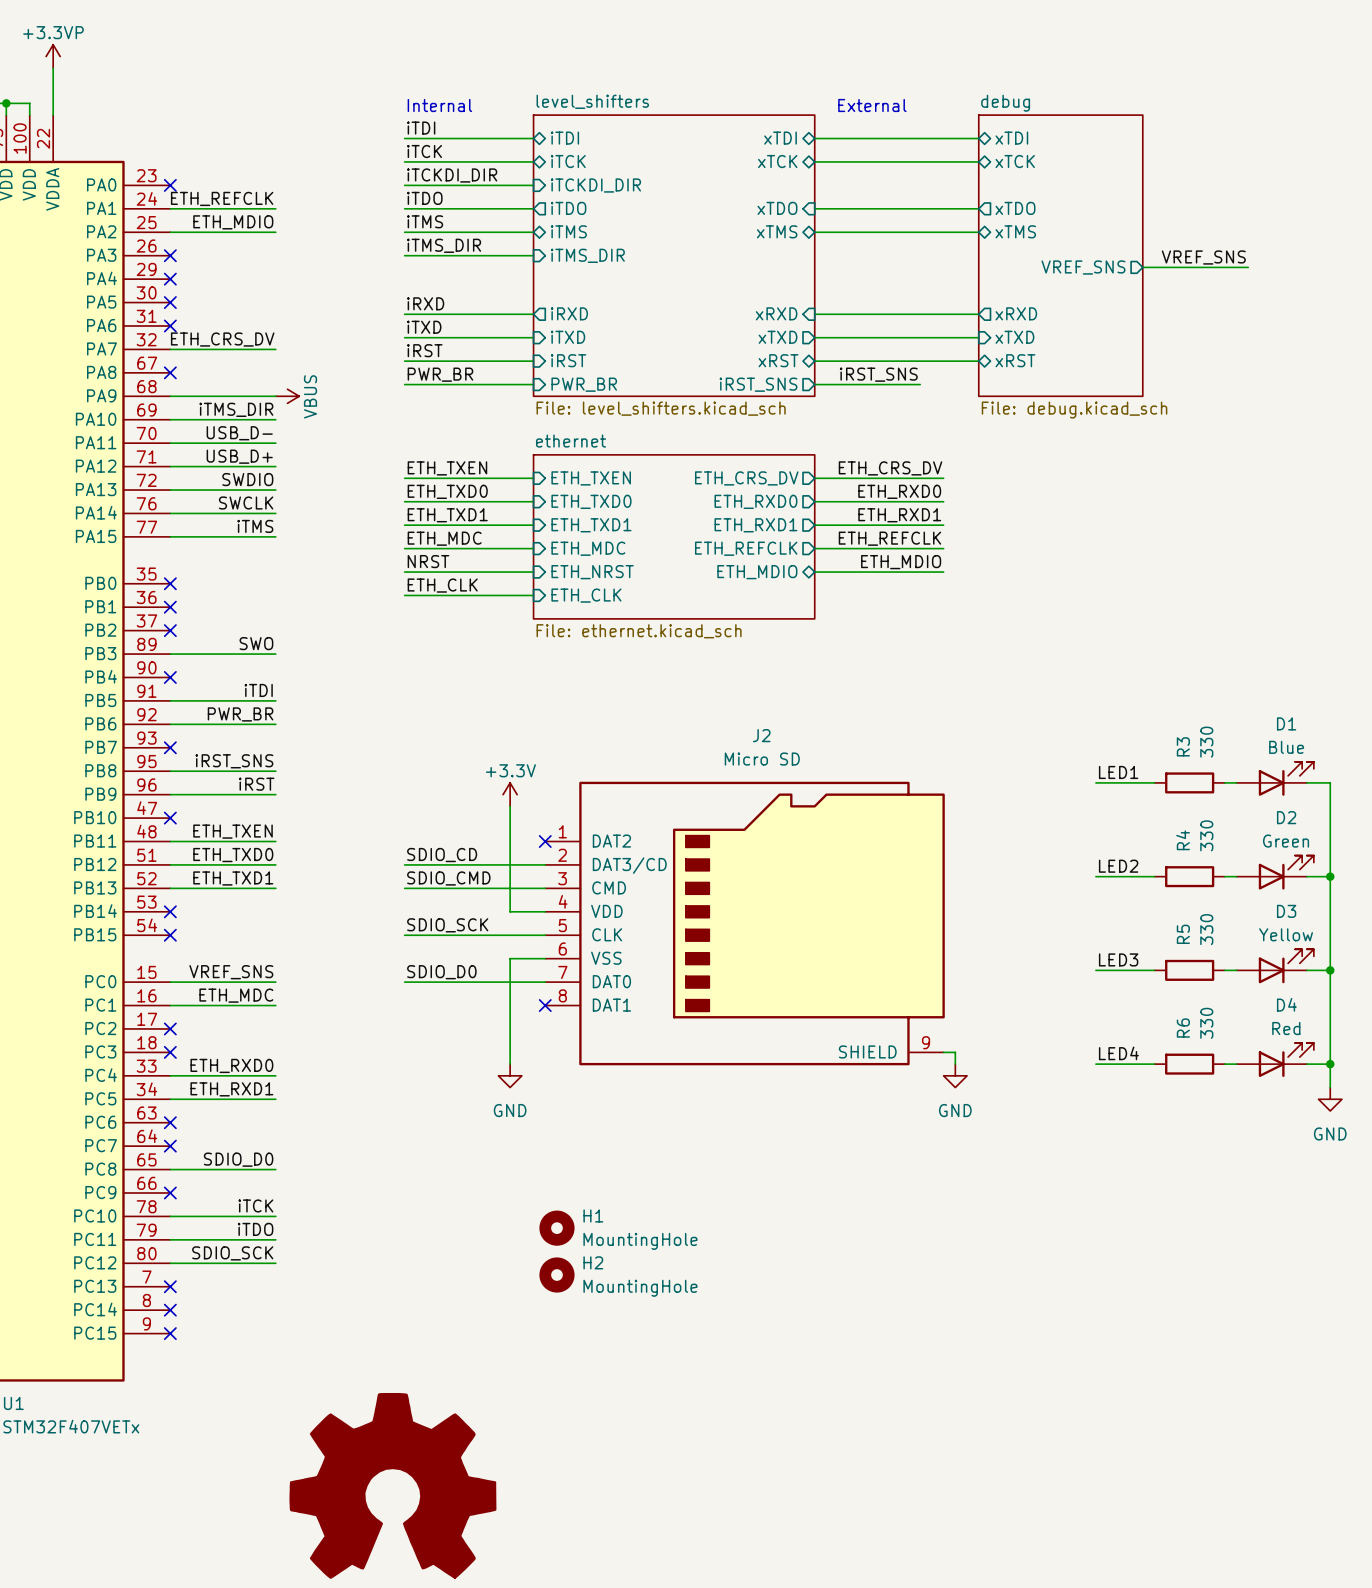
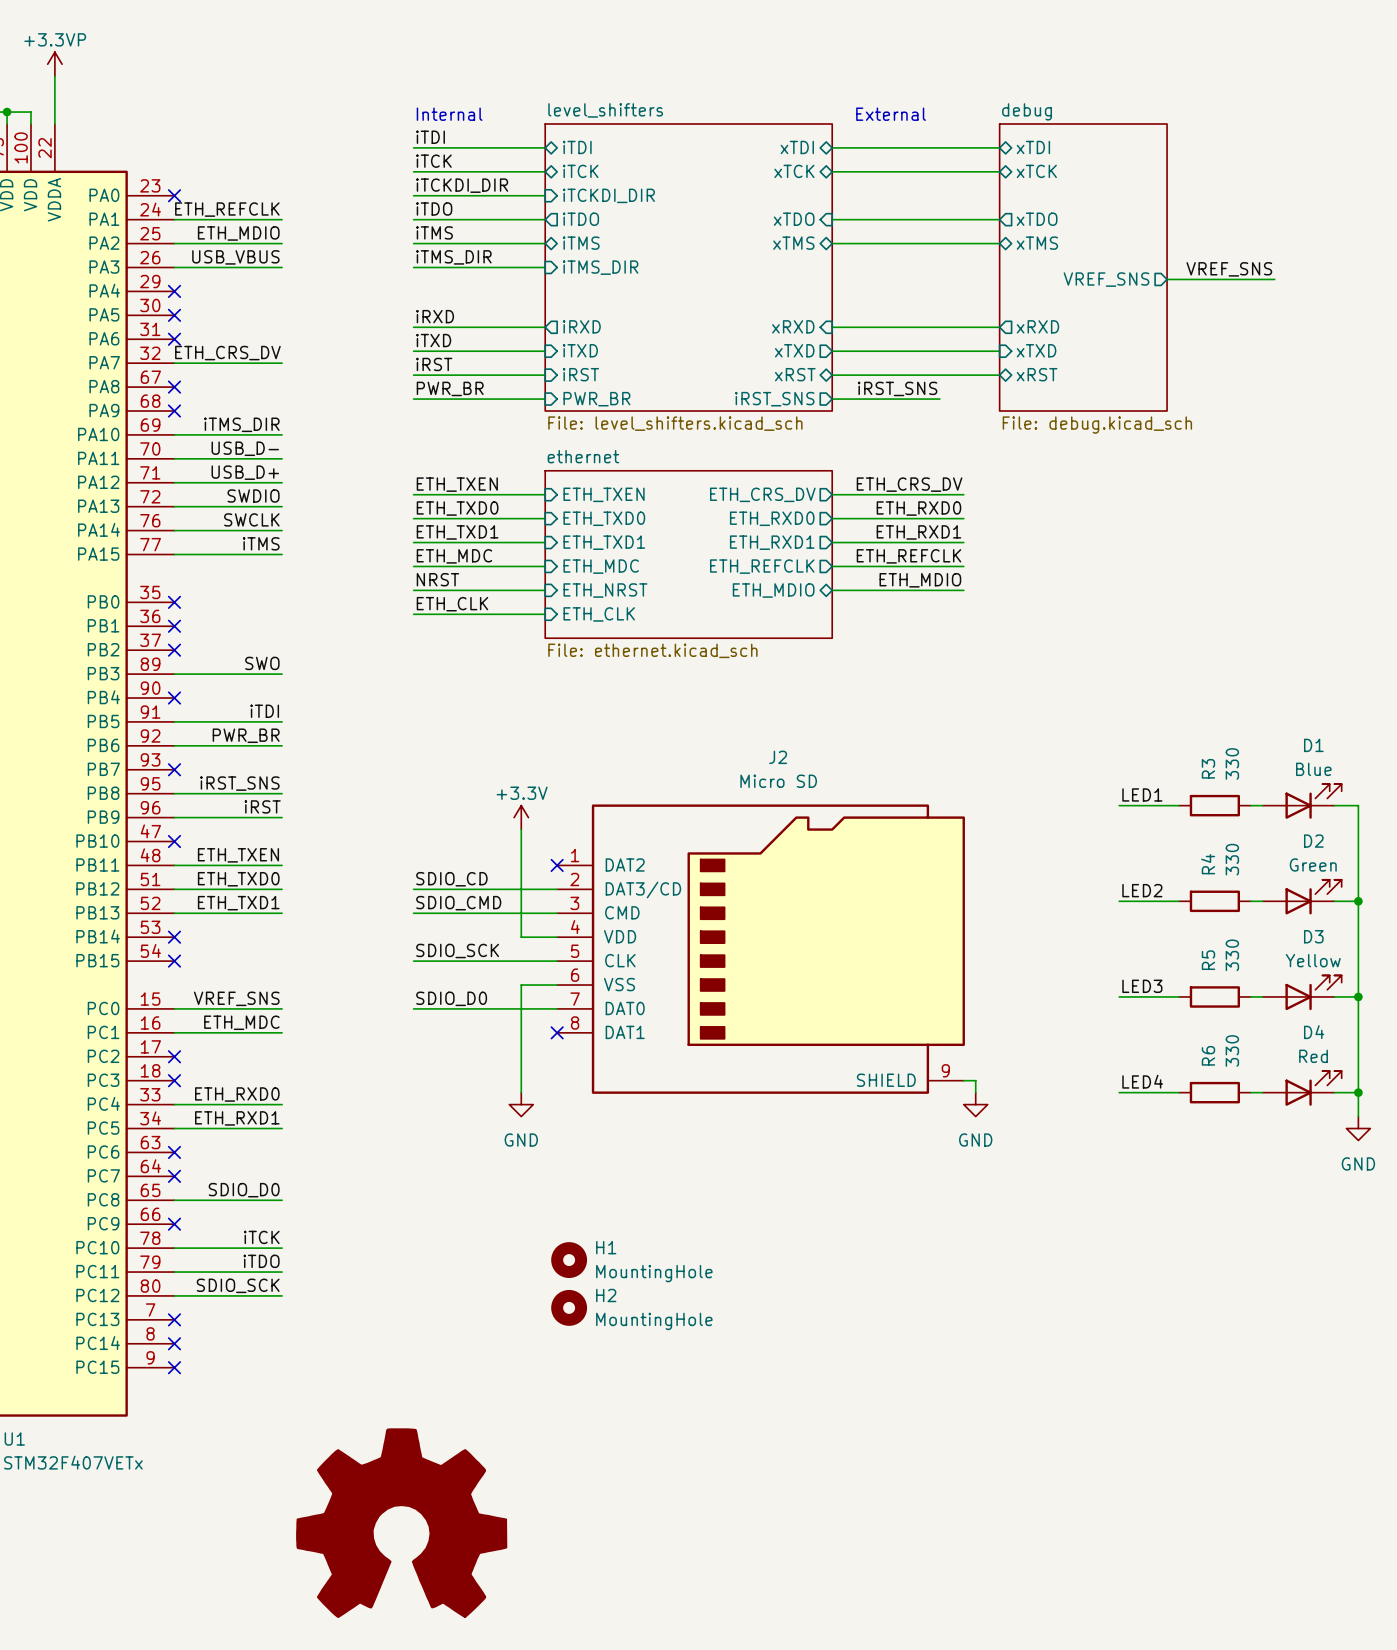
label: none -> USB_VBUS (235, 257)
no-connect mark: (170, 255) -> none
wire: (170, 396) (275, 396) -> (174, 267) (282, 267)
no-connect mark: none -> (174, 411)
power symbol: VBUS (287, 396) -> none

